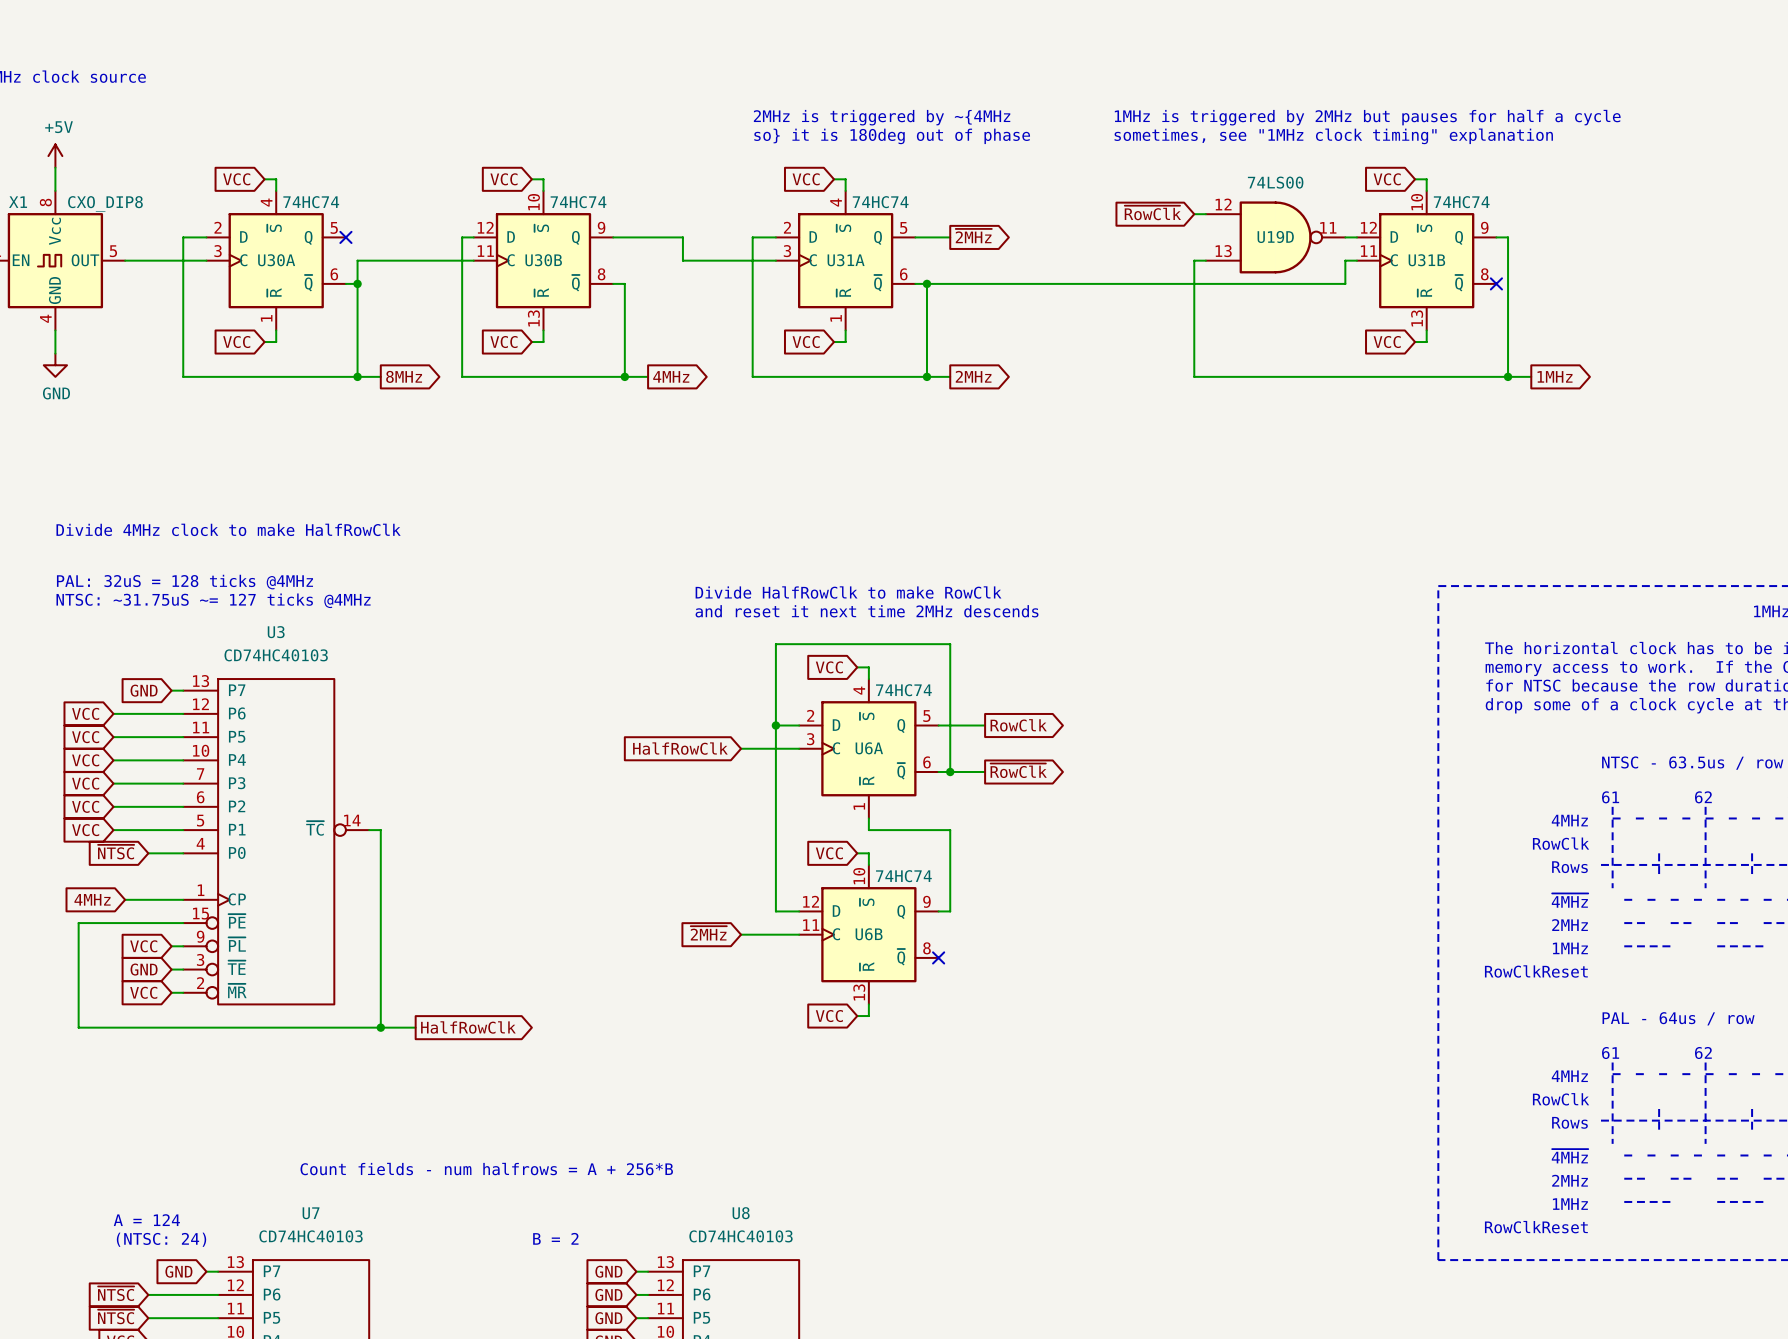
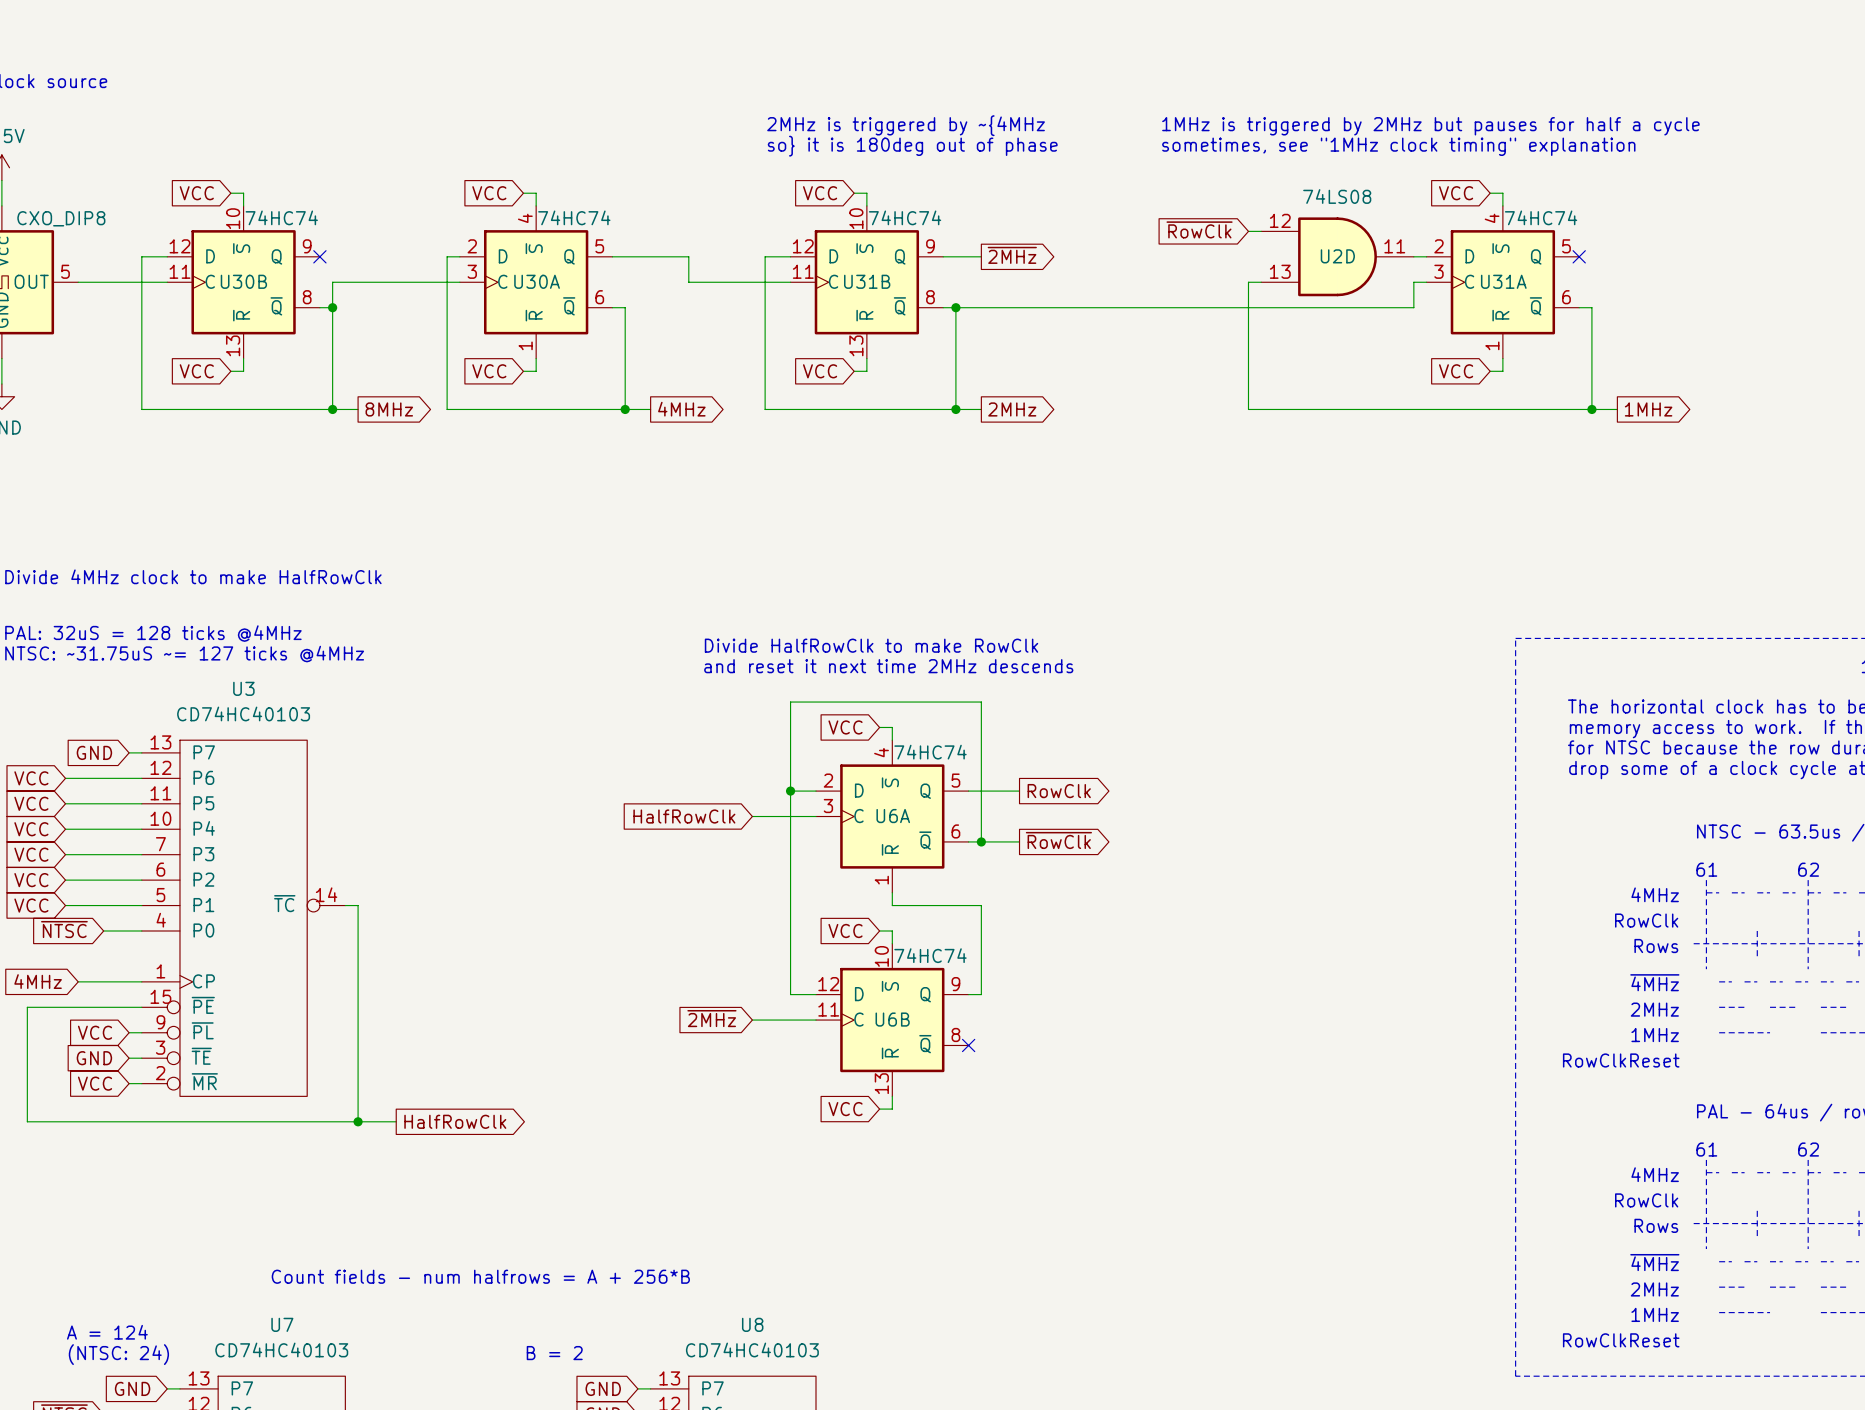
U19D: 74LS00 (1275, 237) -> none
U2D: none -> 74LS08 (1337, 256)
wire: (1496, 237) (1508, 237) (1508, 283) -> (1579, 307) (1591, 307)
U30A position: (276, 260) -> (536, 282)
U30B position: (543, 260) -> (243, 282)
U31A position: (845, 260) -> (1502, 282)
U31B position: (1426, 260) -> (866, 282)
no-connect mark position: (1496, 283) -> (1579, 256)

